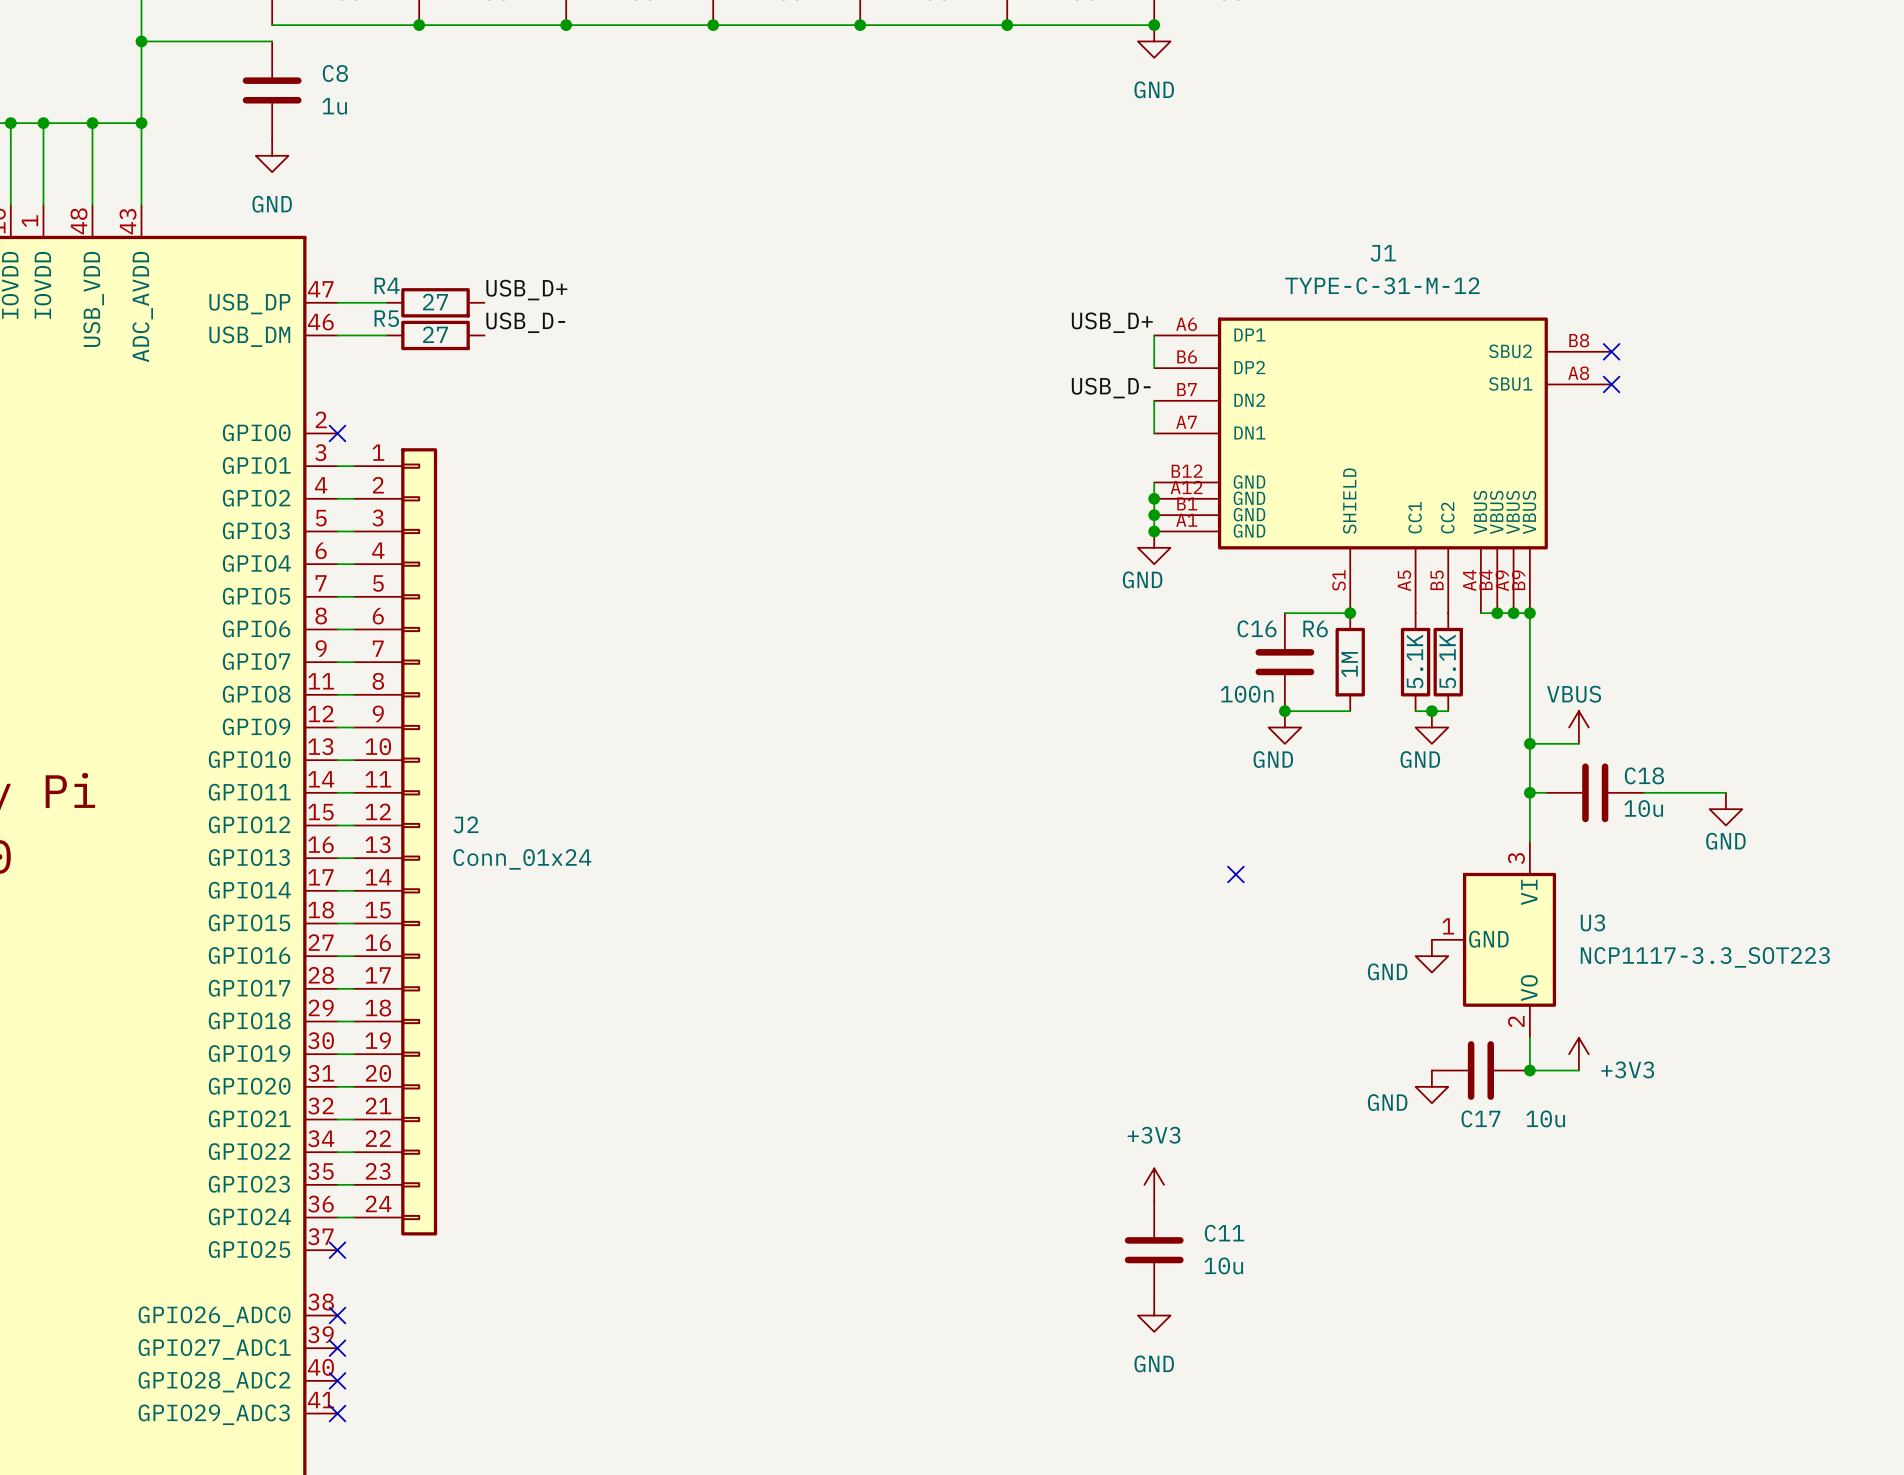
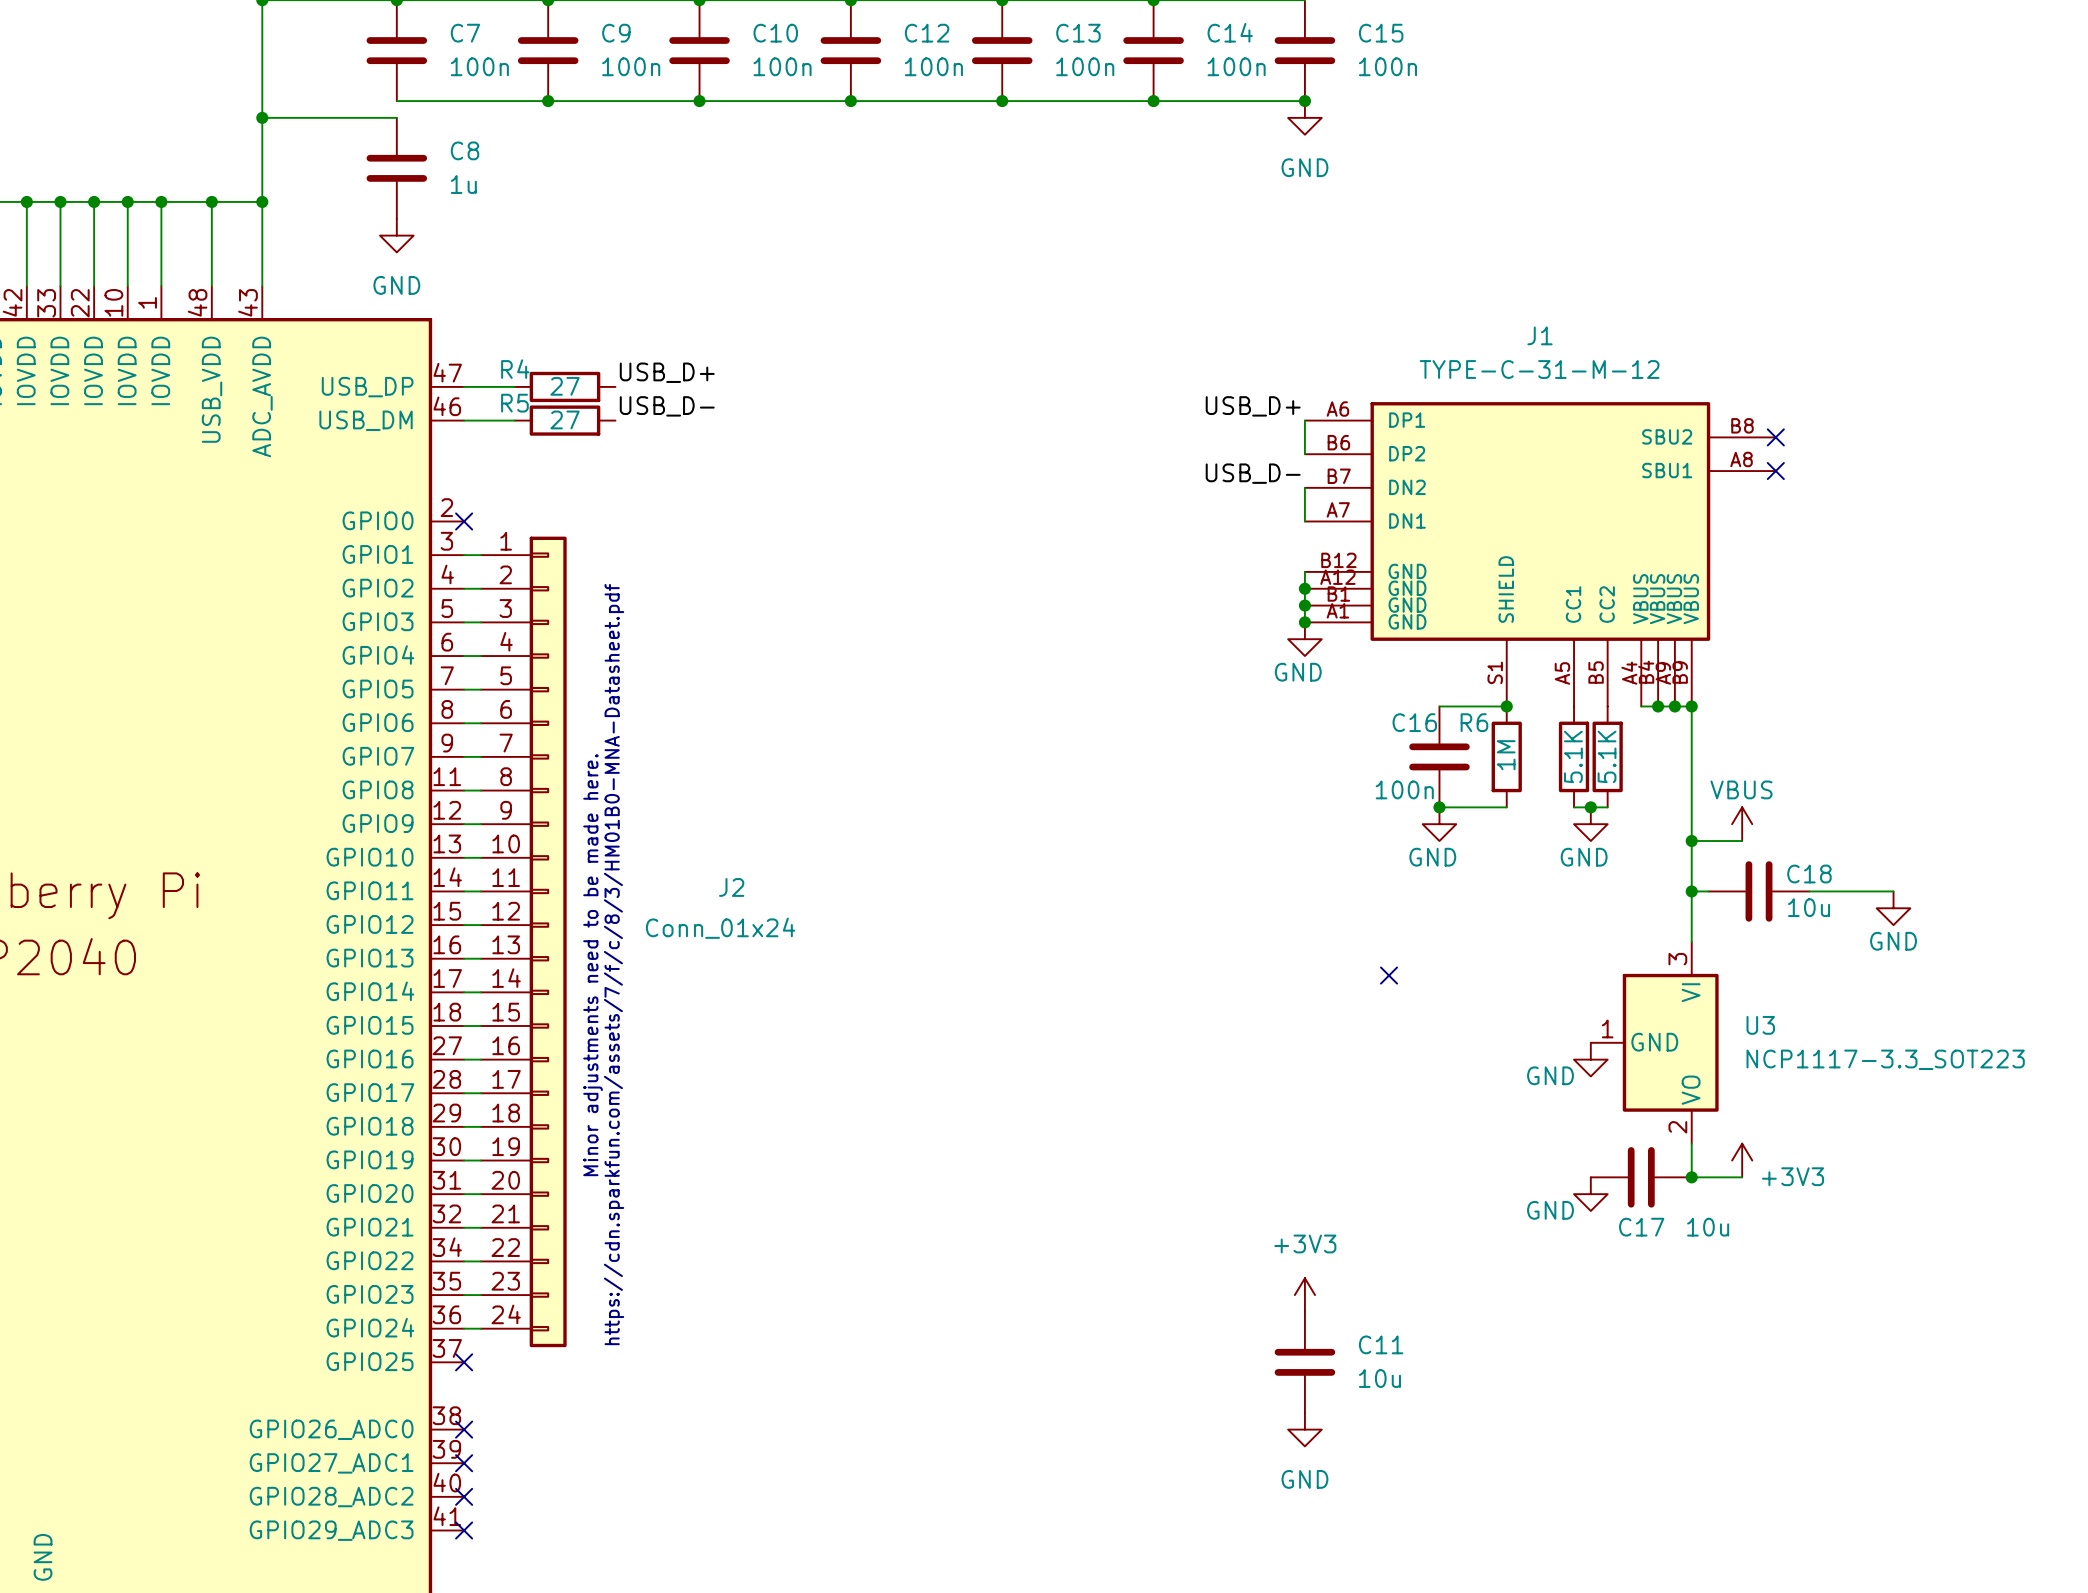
J2 name position: J2 (466, 824) -> J2 (731, 887)
J2 value position: Conn_01x24 (522, 859) -> Conn_01x24 (720, 928)
text: none -> https://cdn.sparkfun.com/assets/7/f/c/8/3/HM01B0-MNA-Datasheet.pdf (614, 964)
text: none -> Minor adjustments need to be made here. (593, 965)

